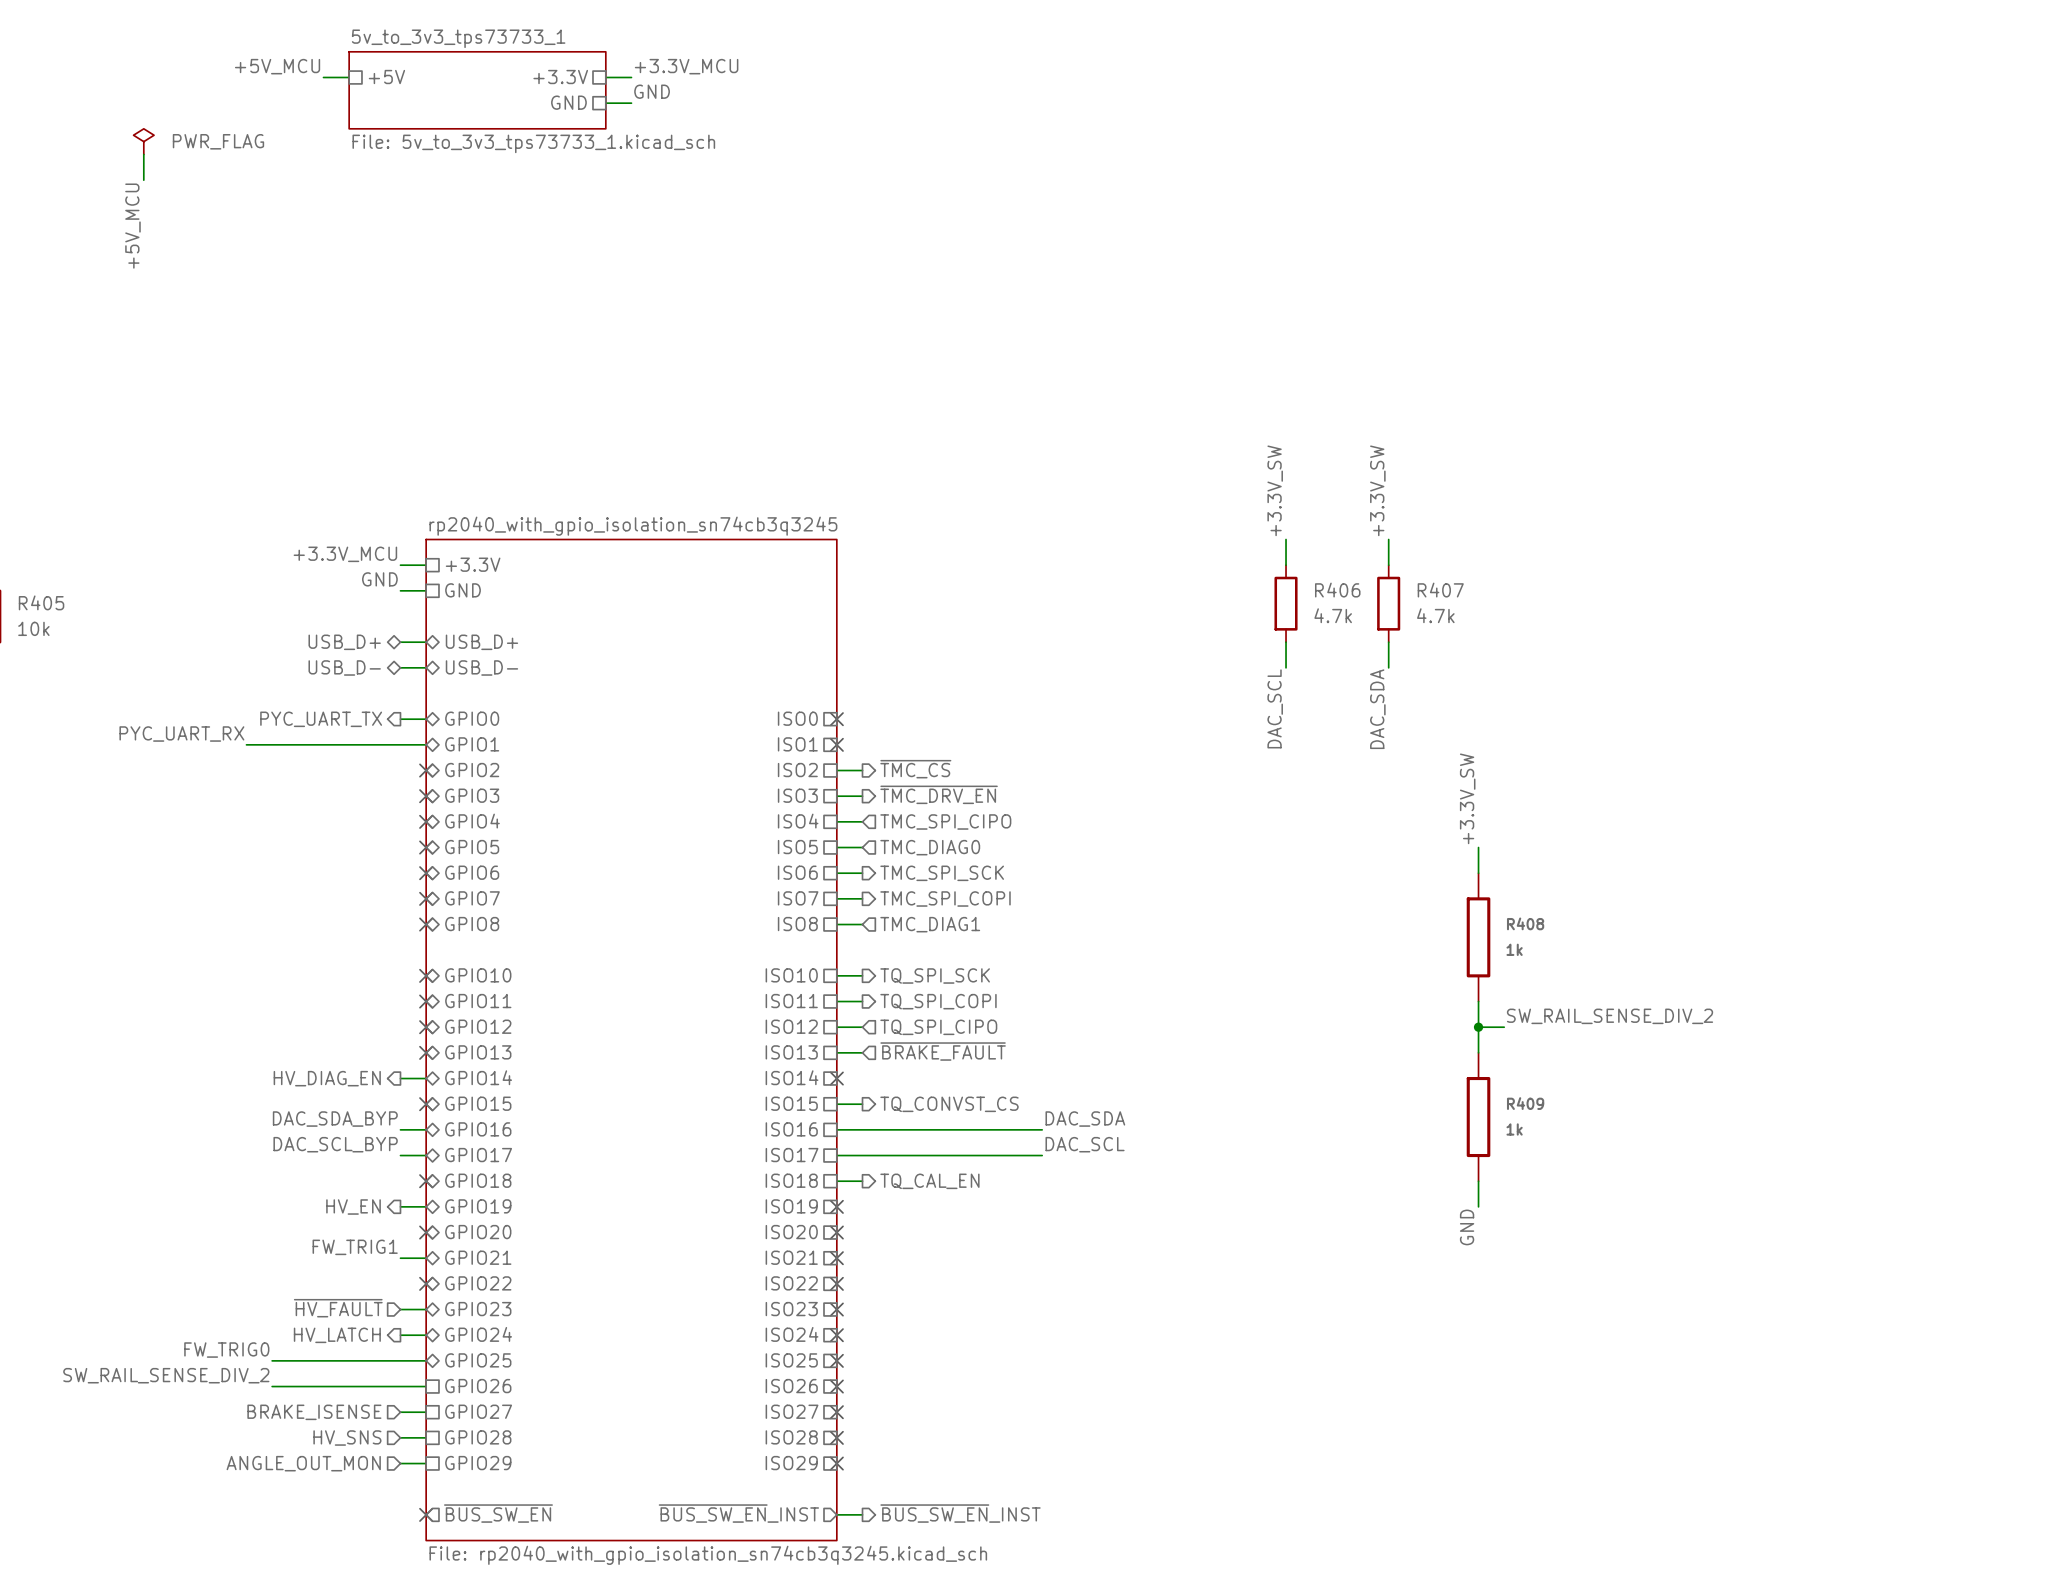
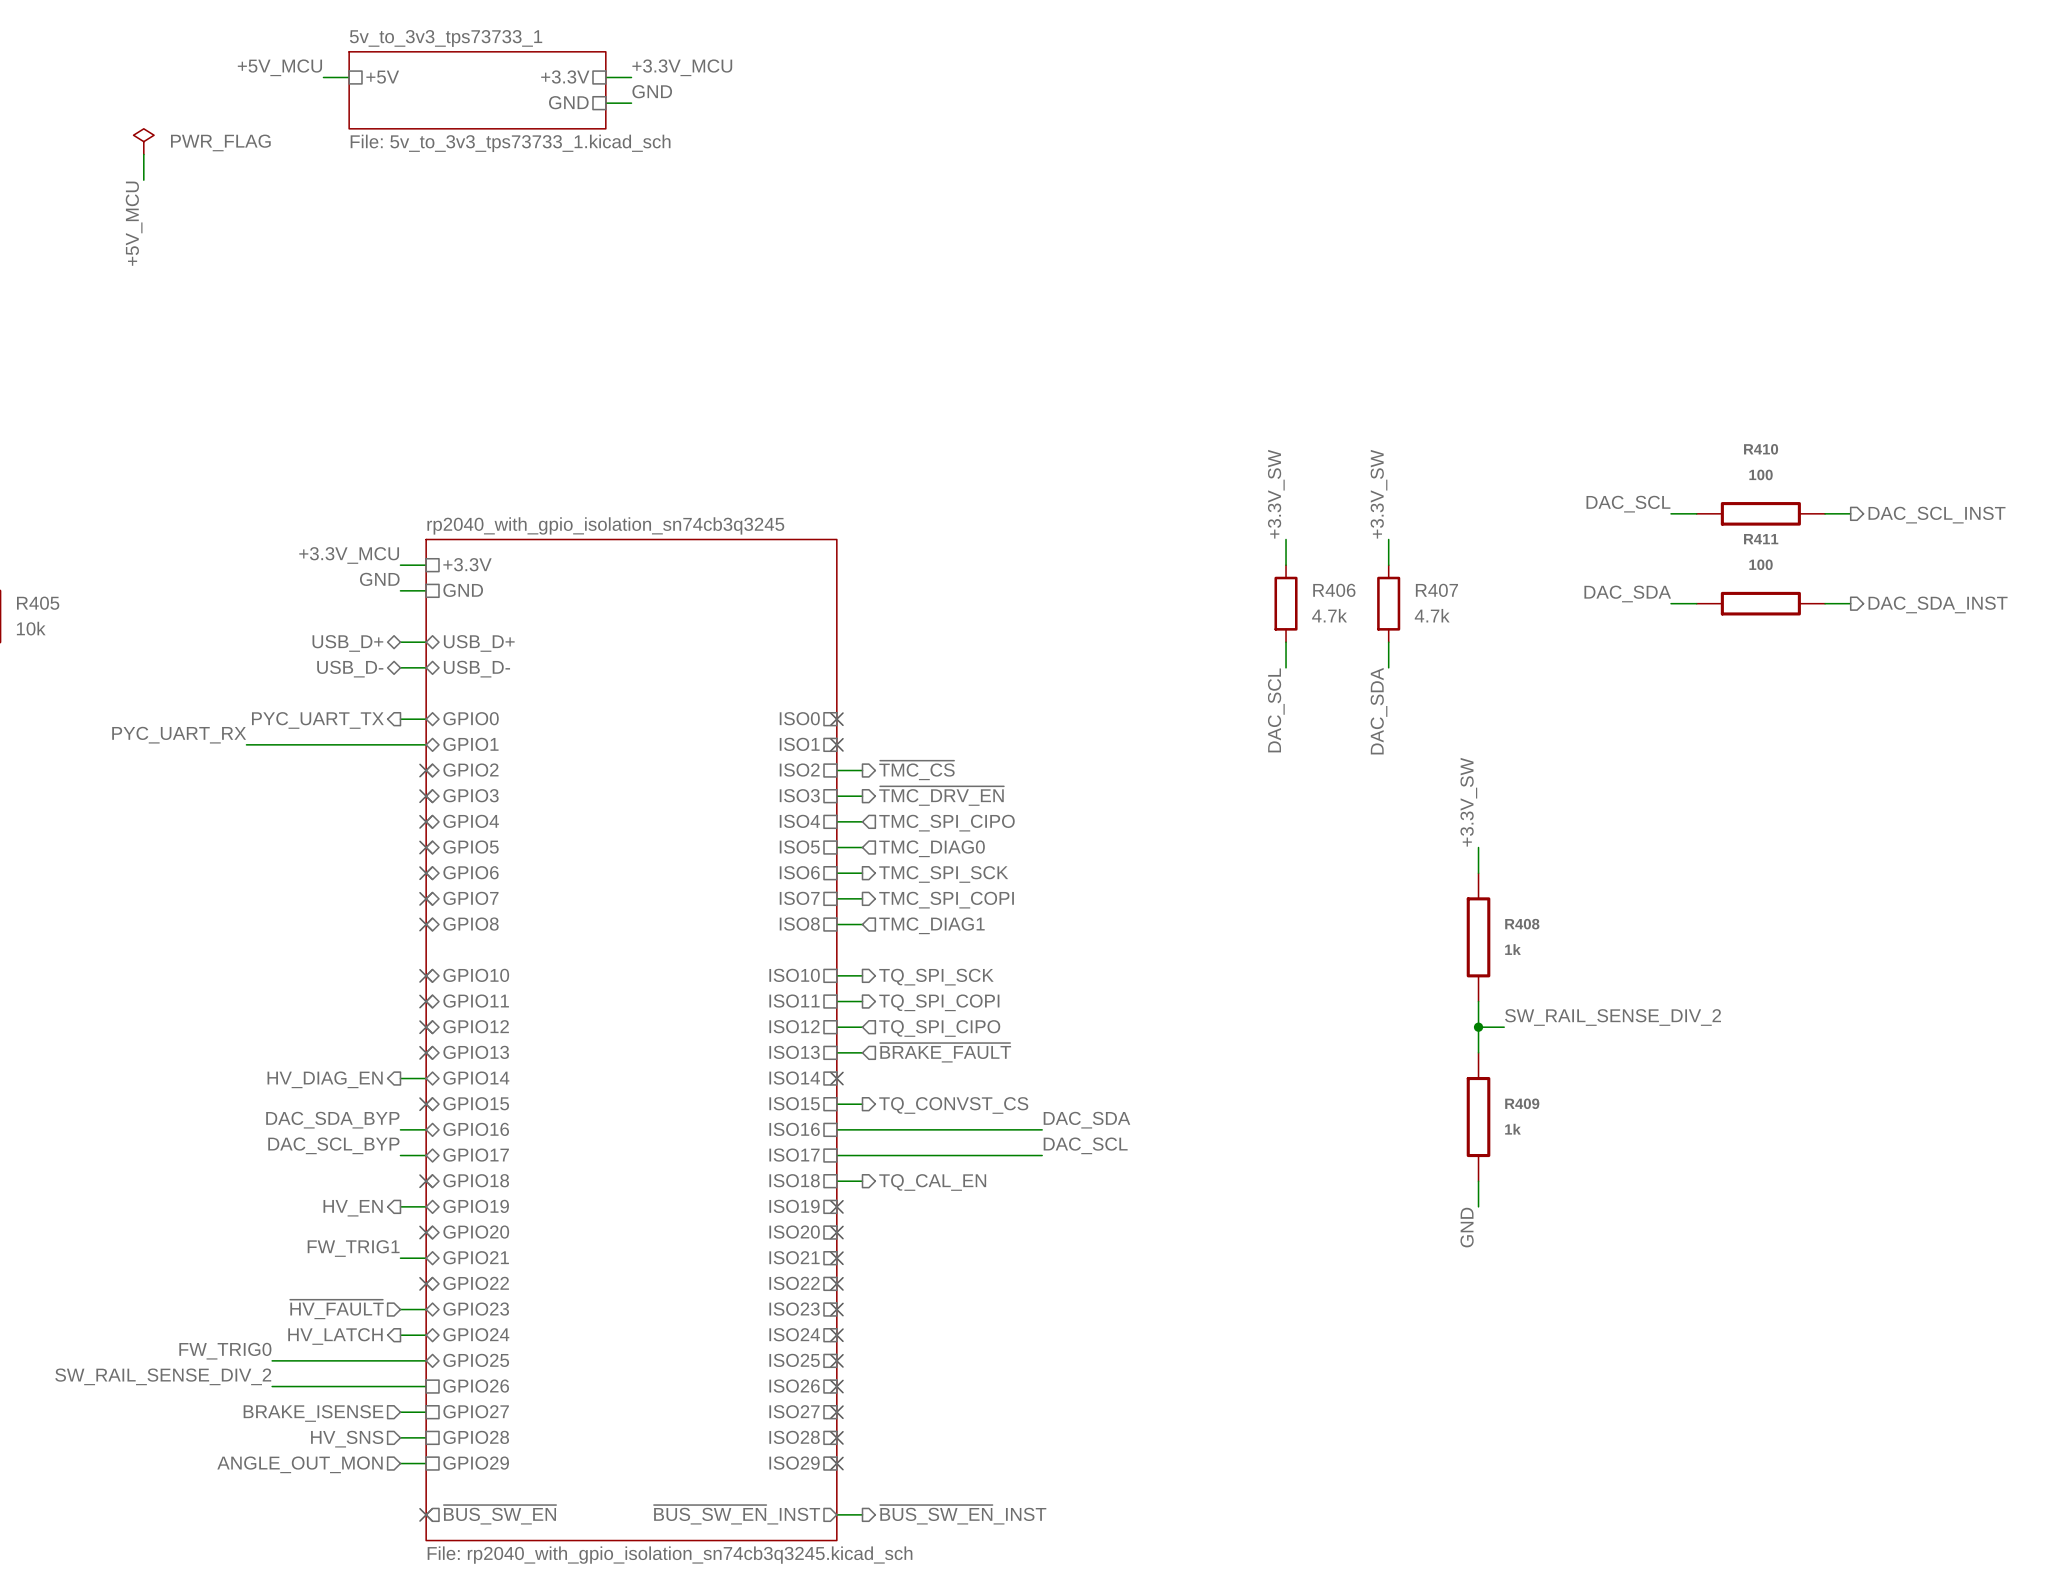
label: none -> DAC_SCL (1628, 504)
wire: none -> (1671, 513) (1696, 513)
R410: none -> 100 (1760, 513)
wire: none -> (1825, 513) (1850, 513)
hierarchical label: none -> DAC_SCL_INST (1937, 515)
label: none -> DAC_SDA (1627, 593)
wire: none -> (1671, 603) (1696, 603)
R411: none -> 100 (1760, 603)
wire: none -> (1825, 603) (1850, 603)
hierarchical label: none -> DAC_SDA_INST (1938, 604)

